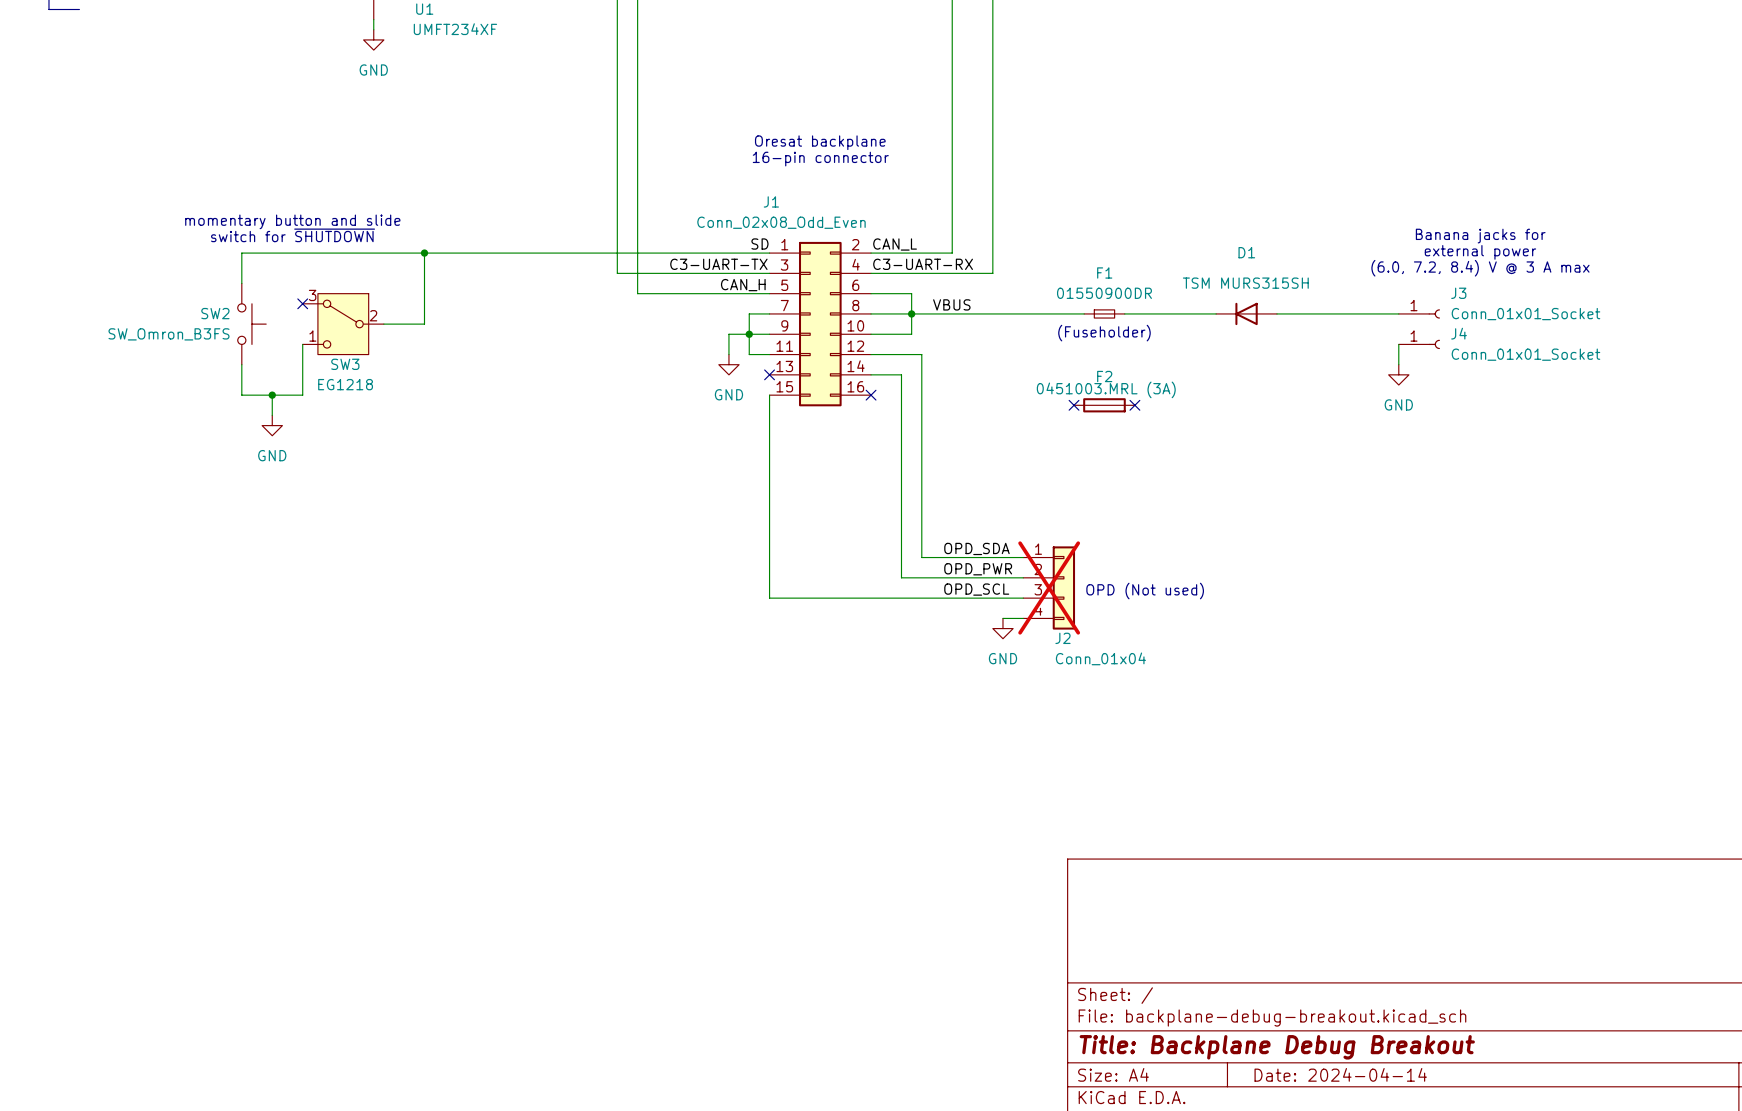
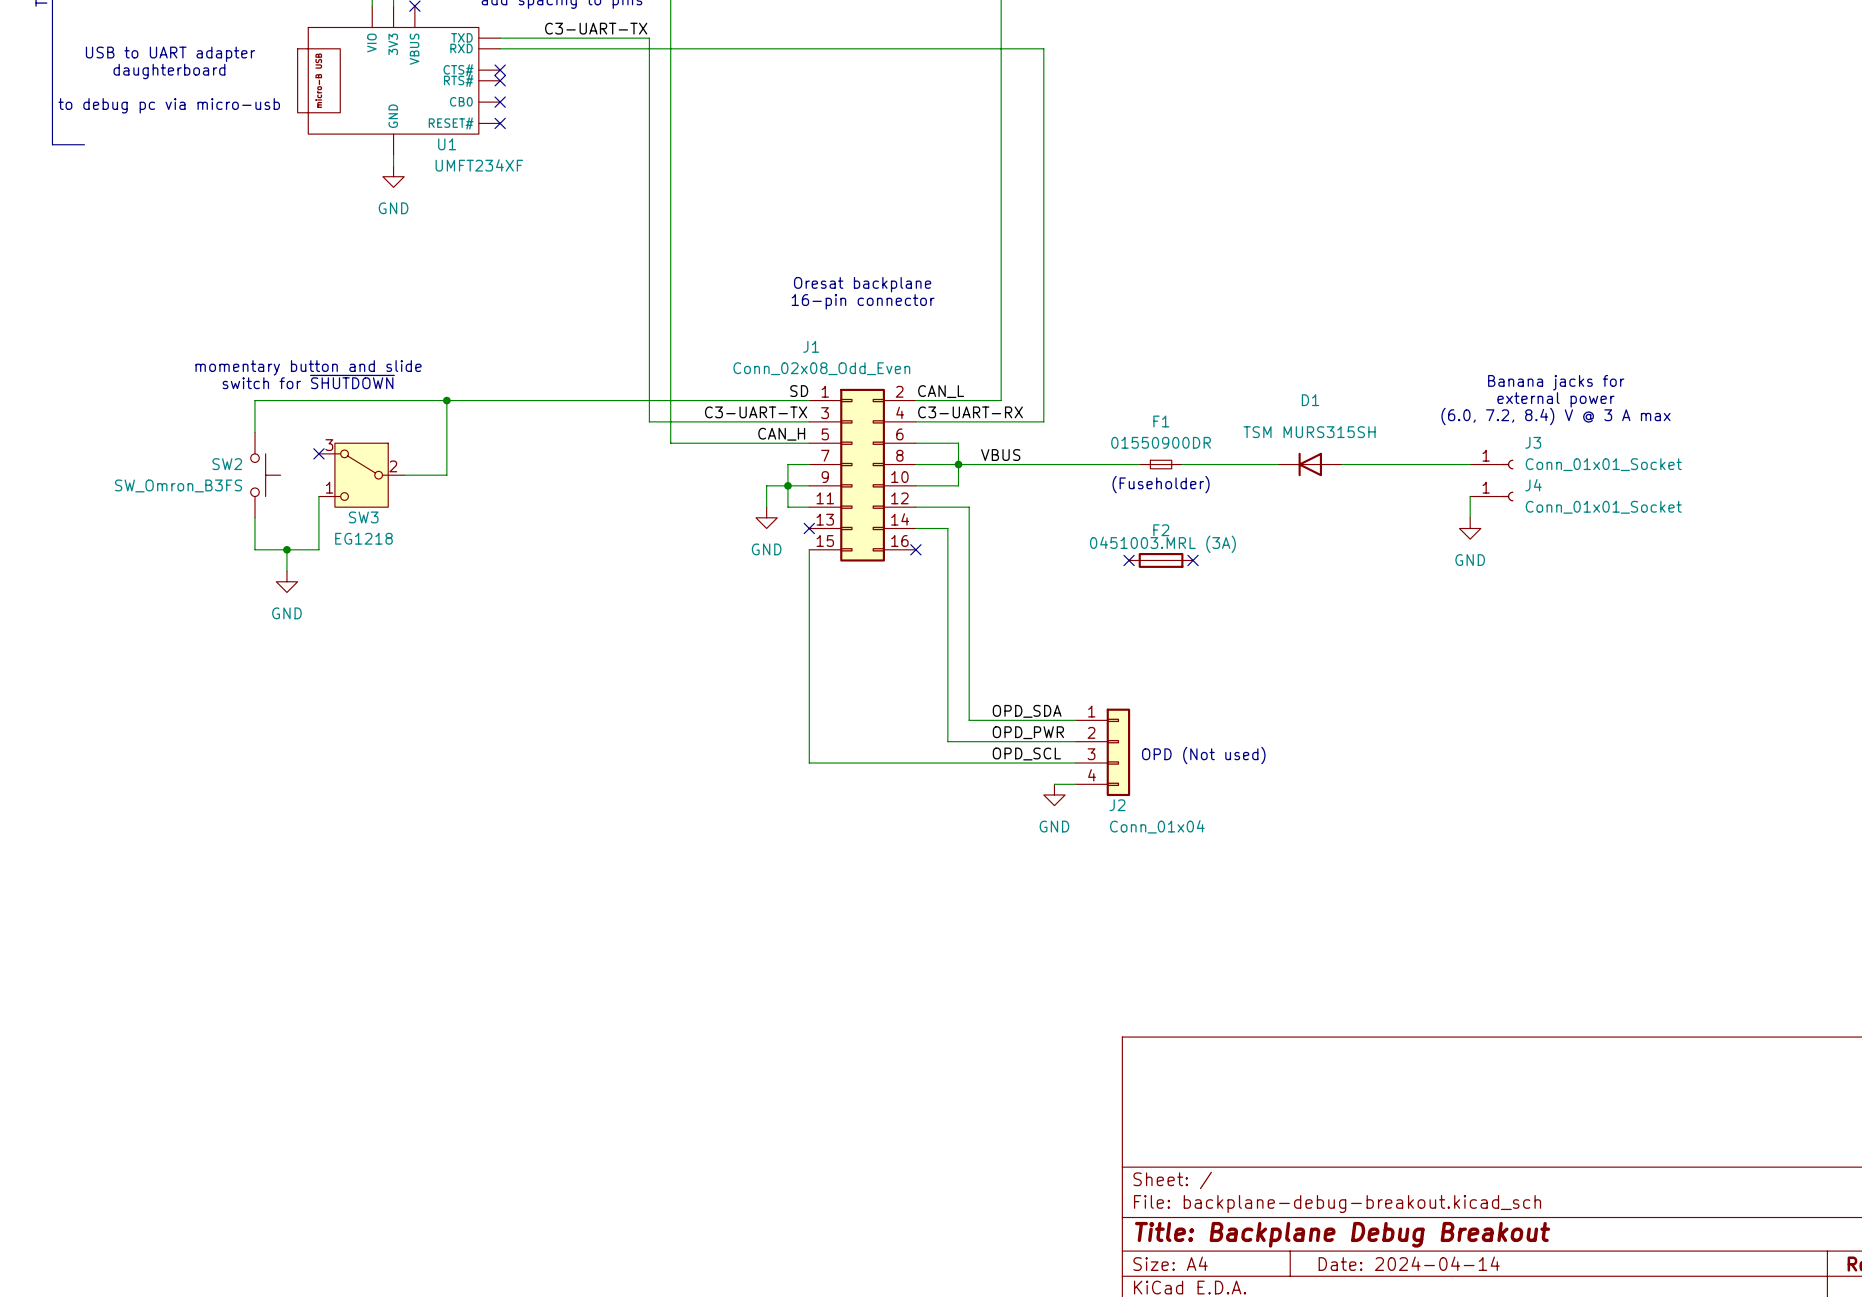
J2 do-not-place cross: (1049, 587) -> none

